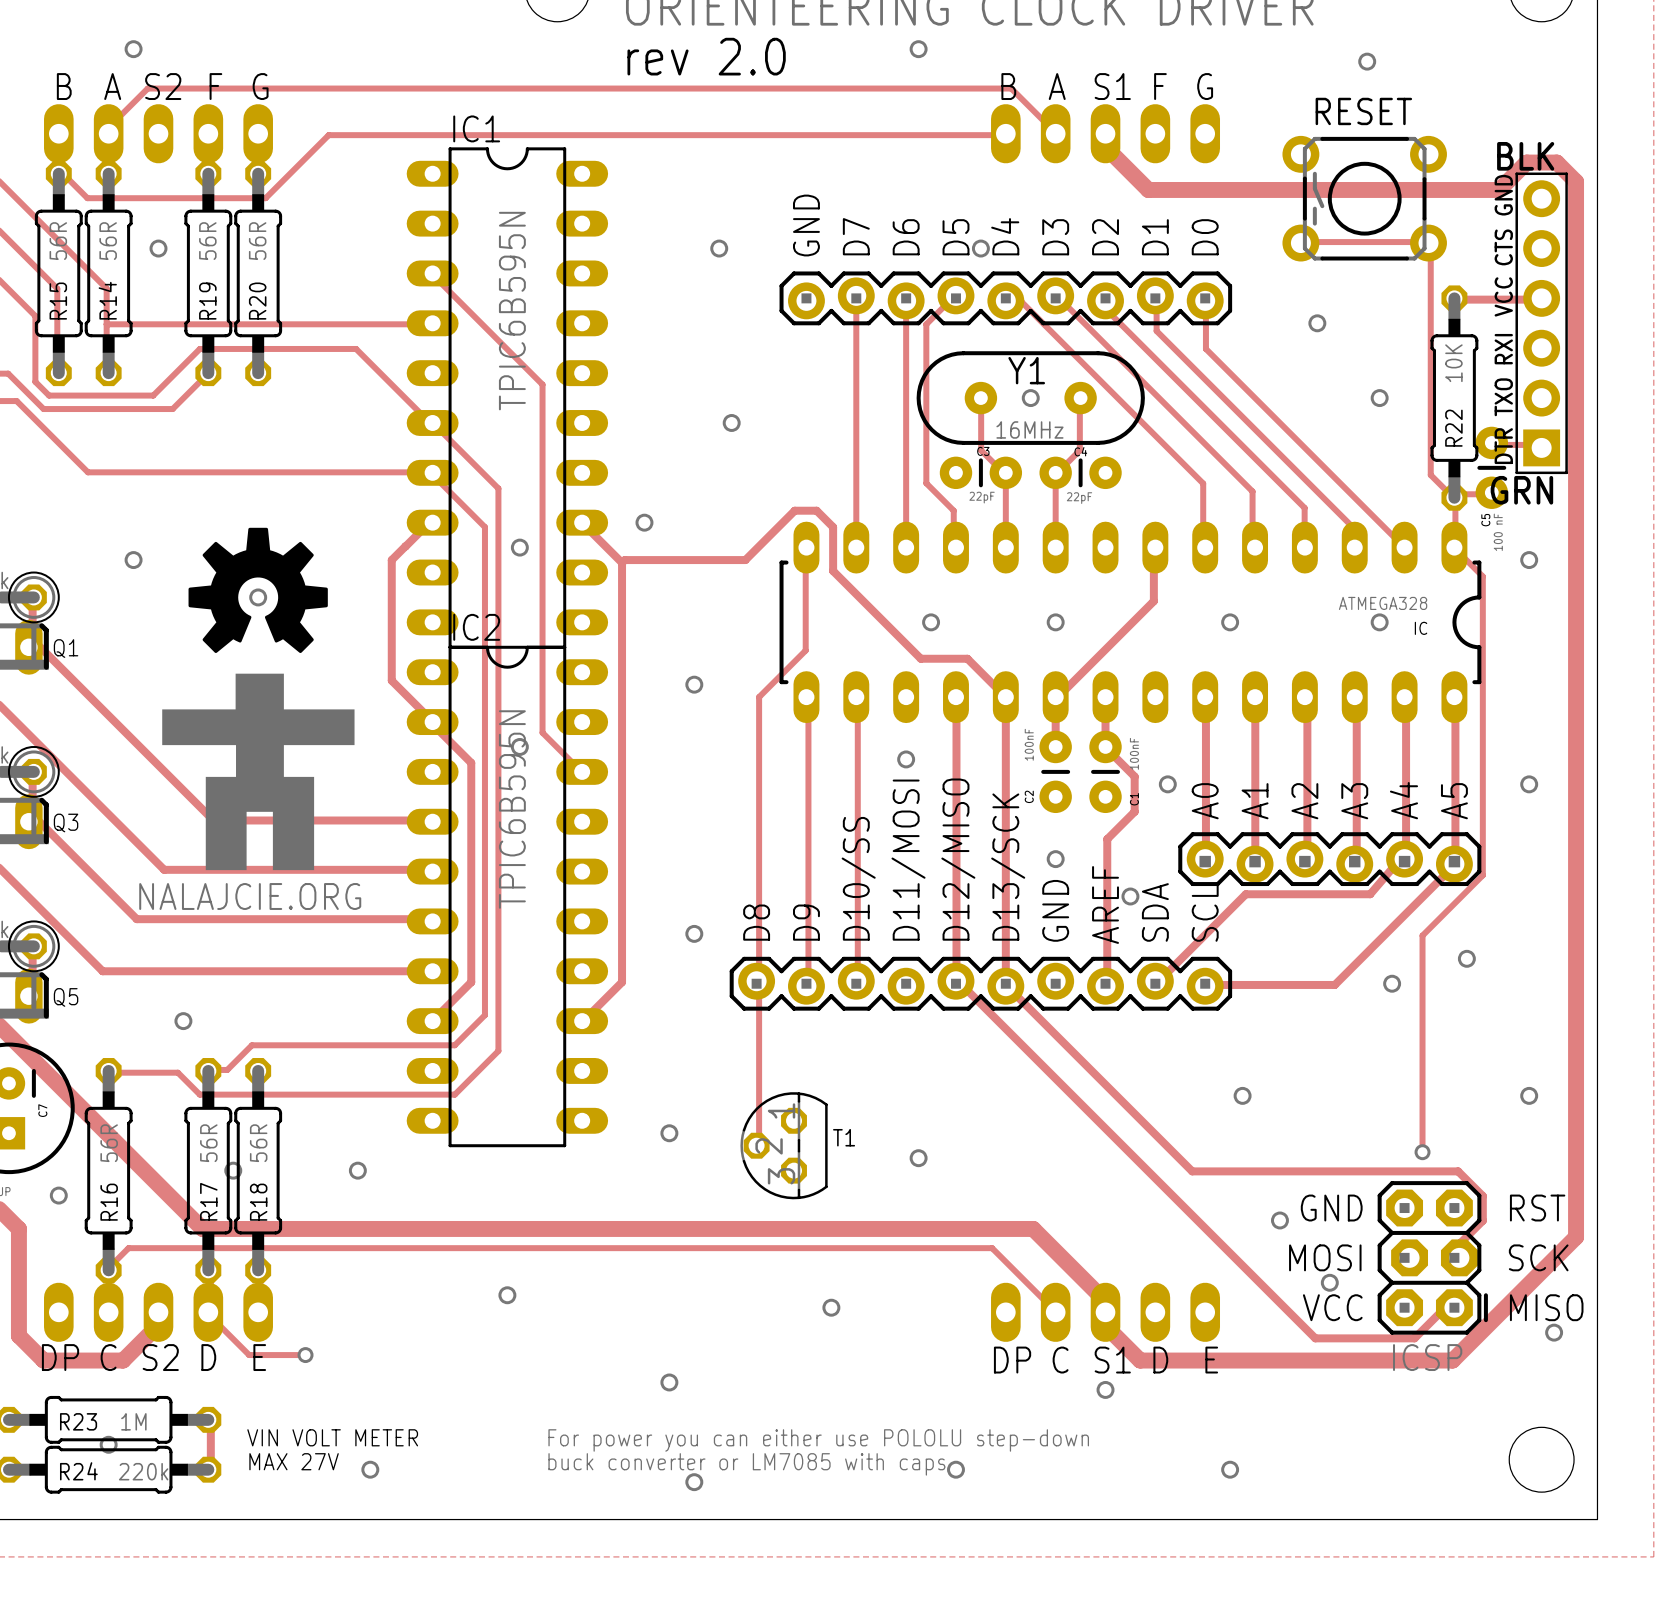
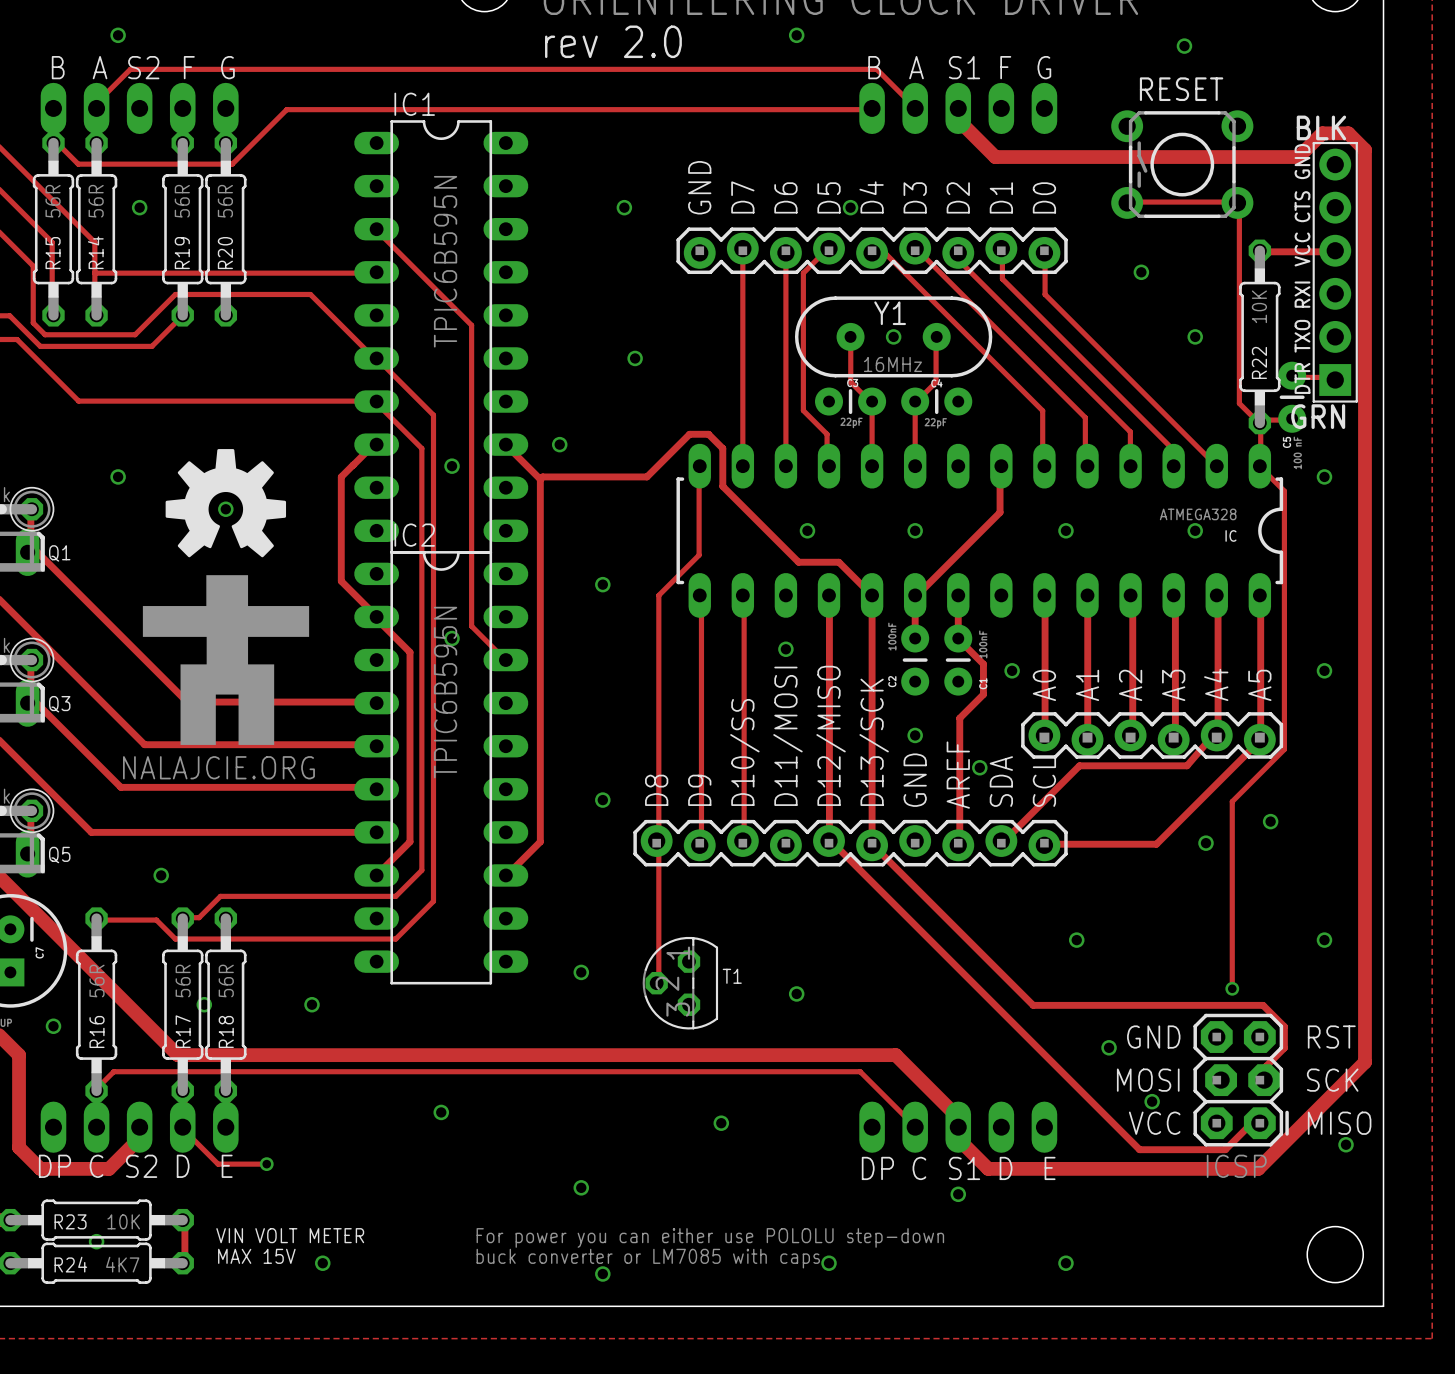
R23 value: 1M (133, 1421) -> 10K (123, 1221)
text: MAX 27V (294, 1461) -> MAX 15V (256, 1256)
R24 value: 220k (143, 1471) -> 4K7 (122, 1264)

